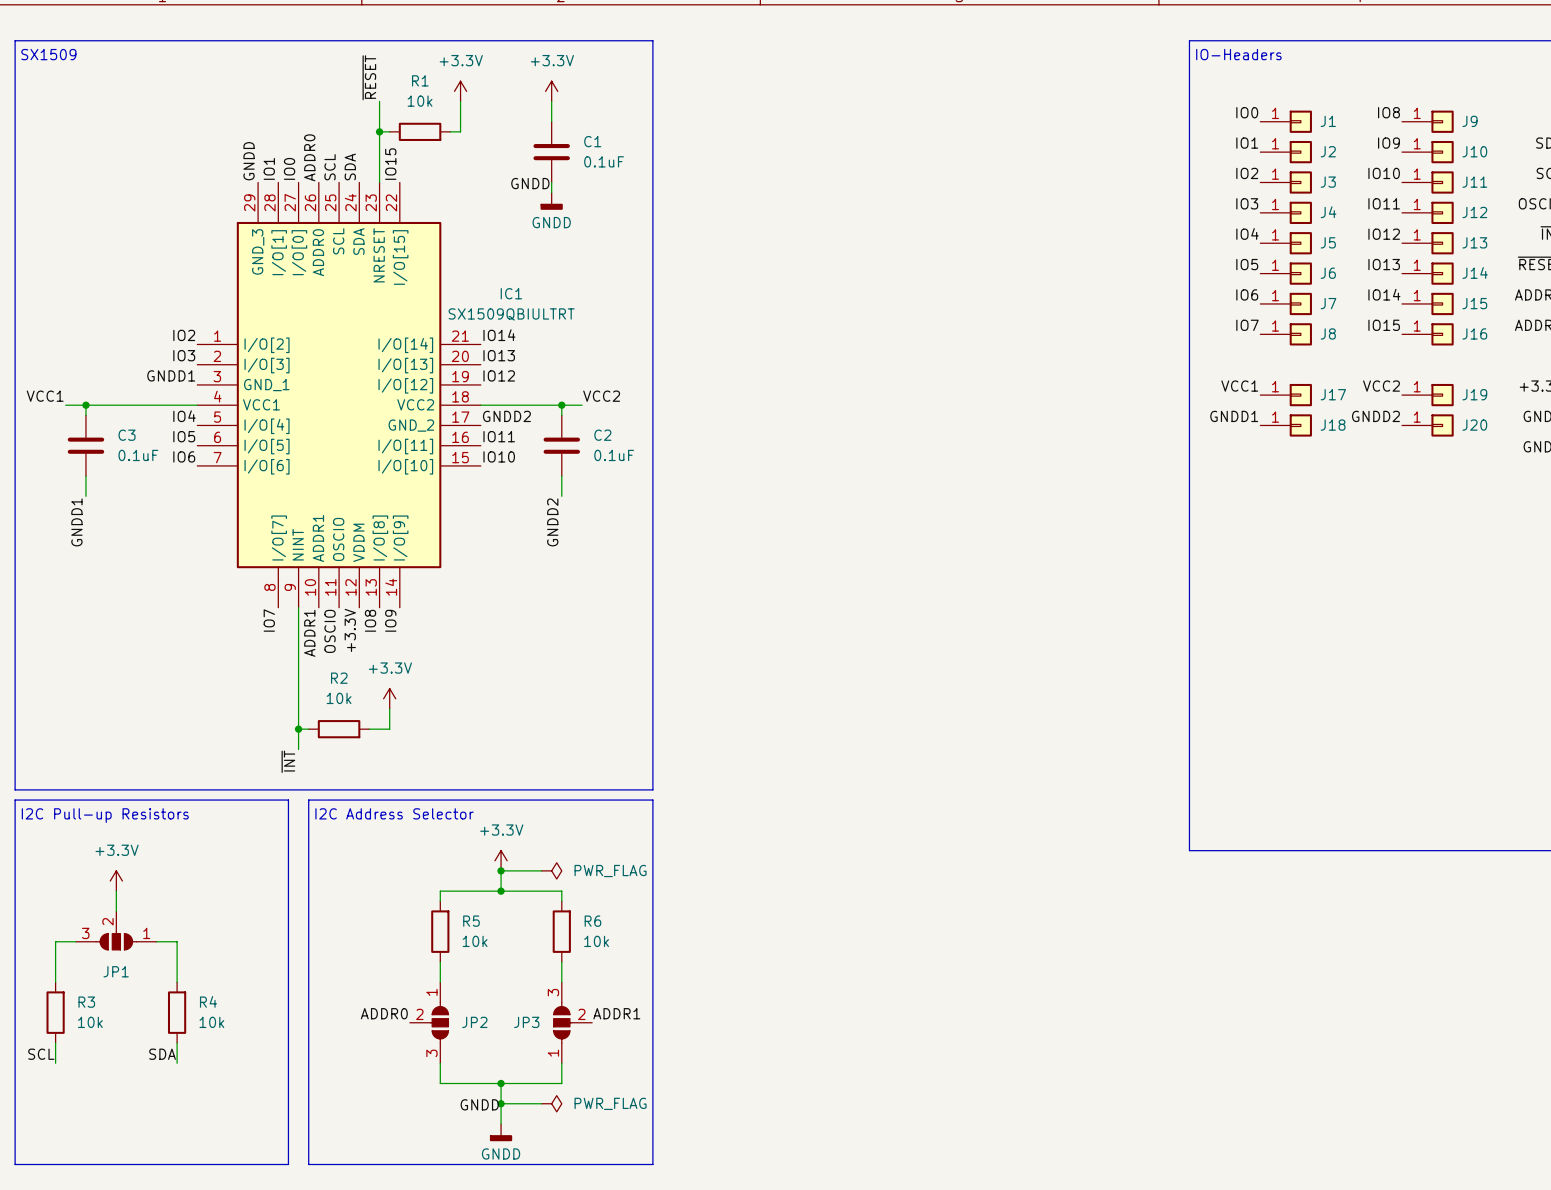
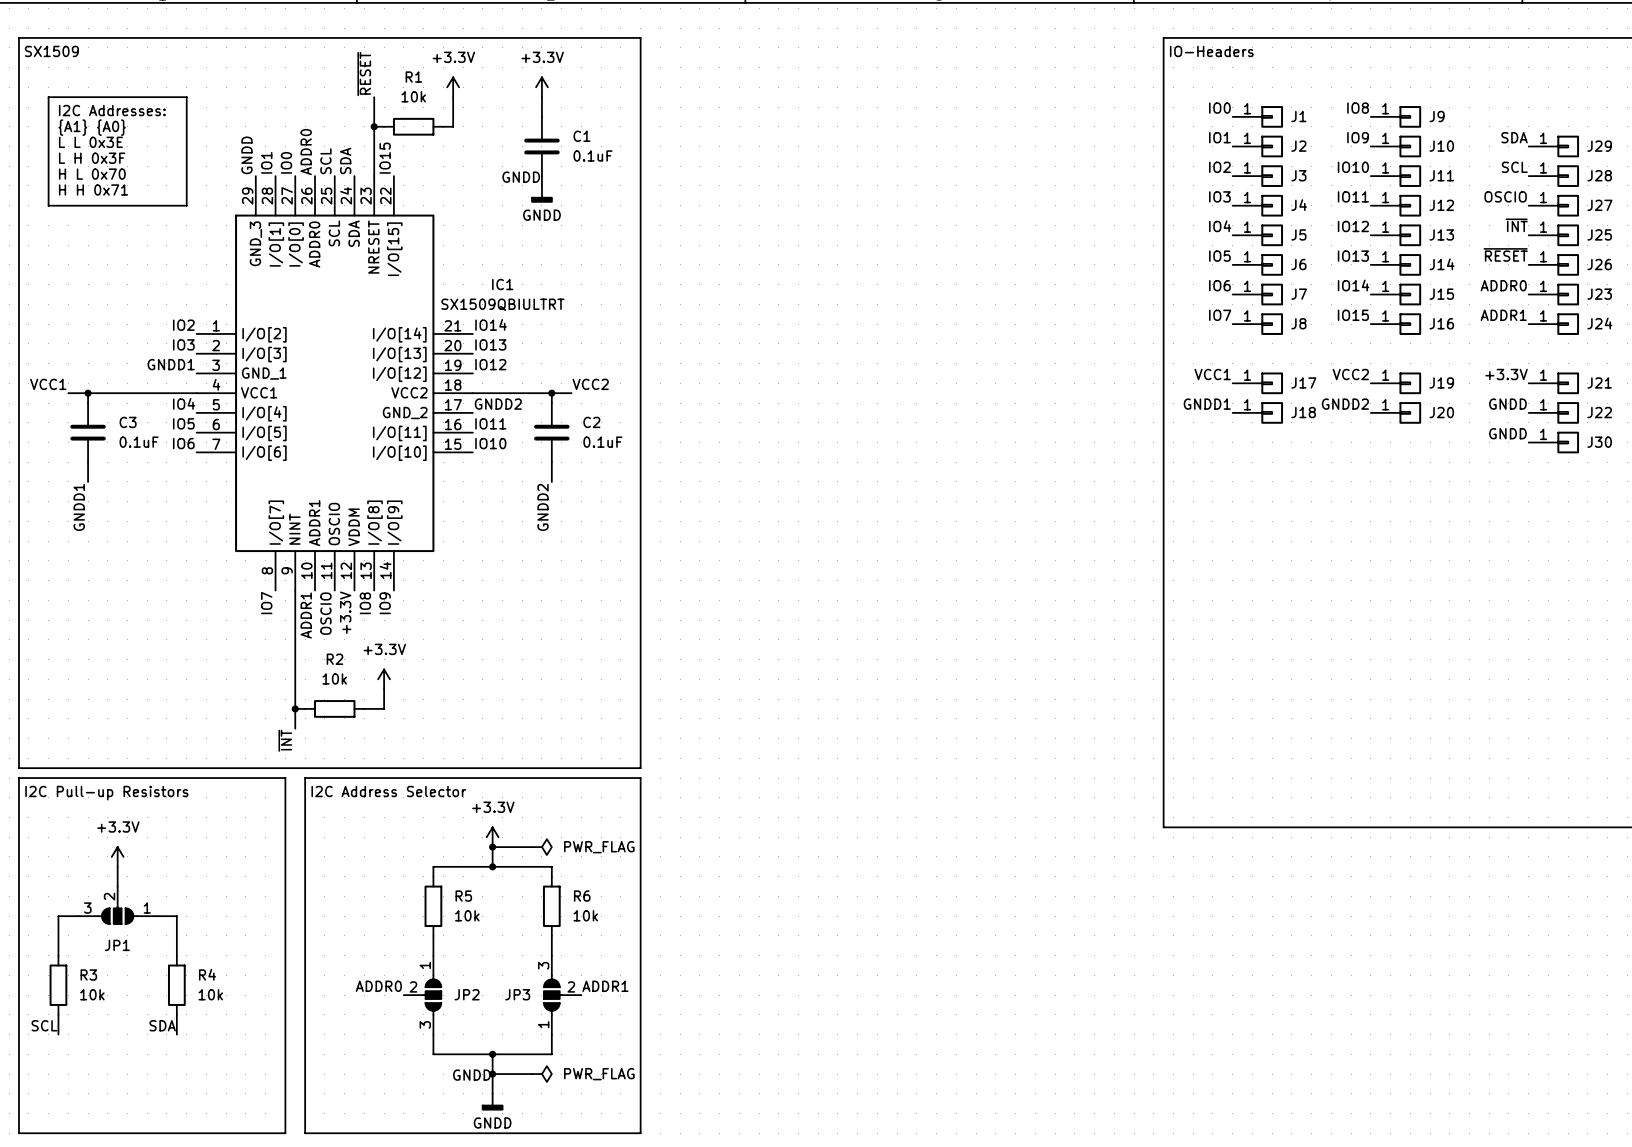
line: none -> (48, 97) (186, 97) (186, 205) (48, 205) (48, 97)
text: none -> I2C Addresses: (112, 110)
text: none -> {A1} {A0} (92, 127)
text: none -> L L 0x3E (90, 142)
text: none -> L H 0x3F (92, 158)
text: none -> H L 0x70 (92, 174)
text: none -> H H 0x71 (93, 189)

